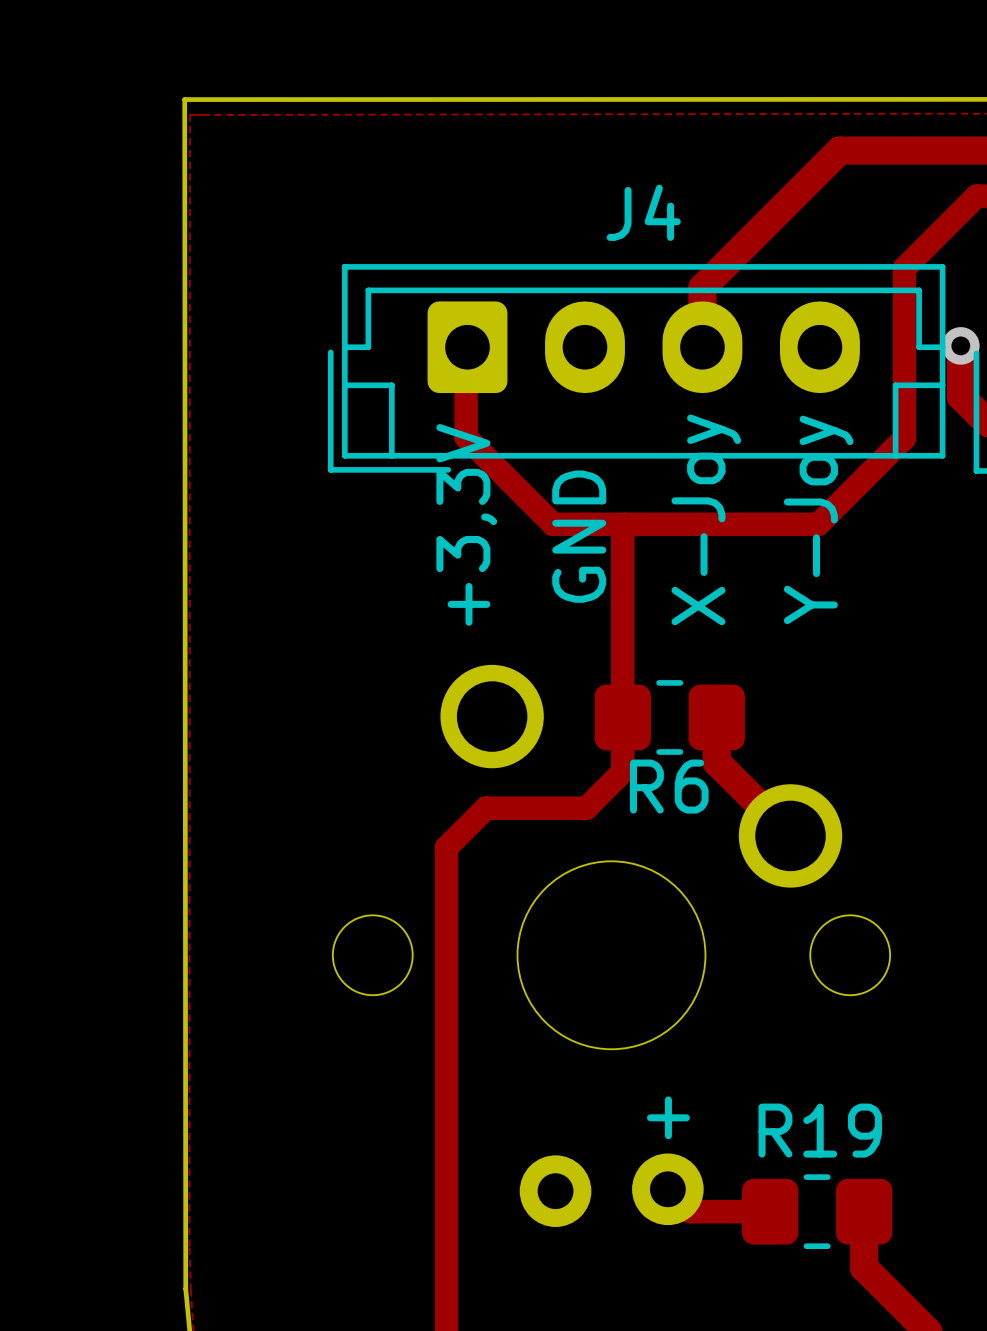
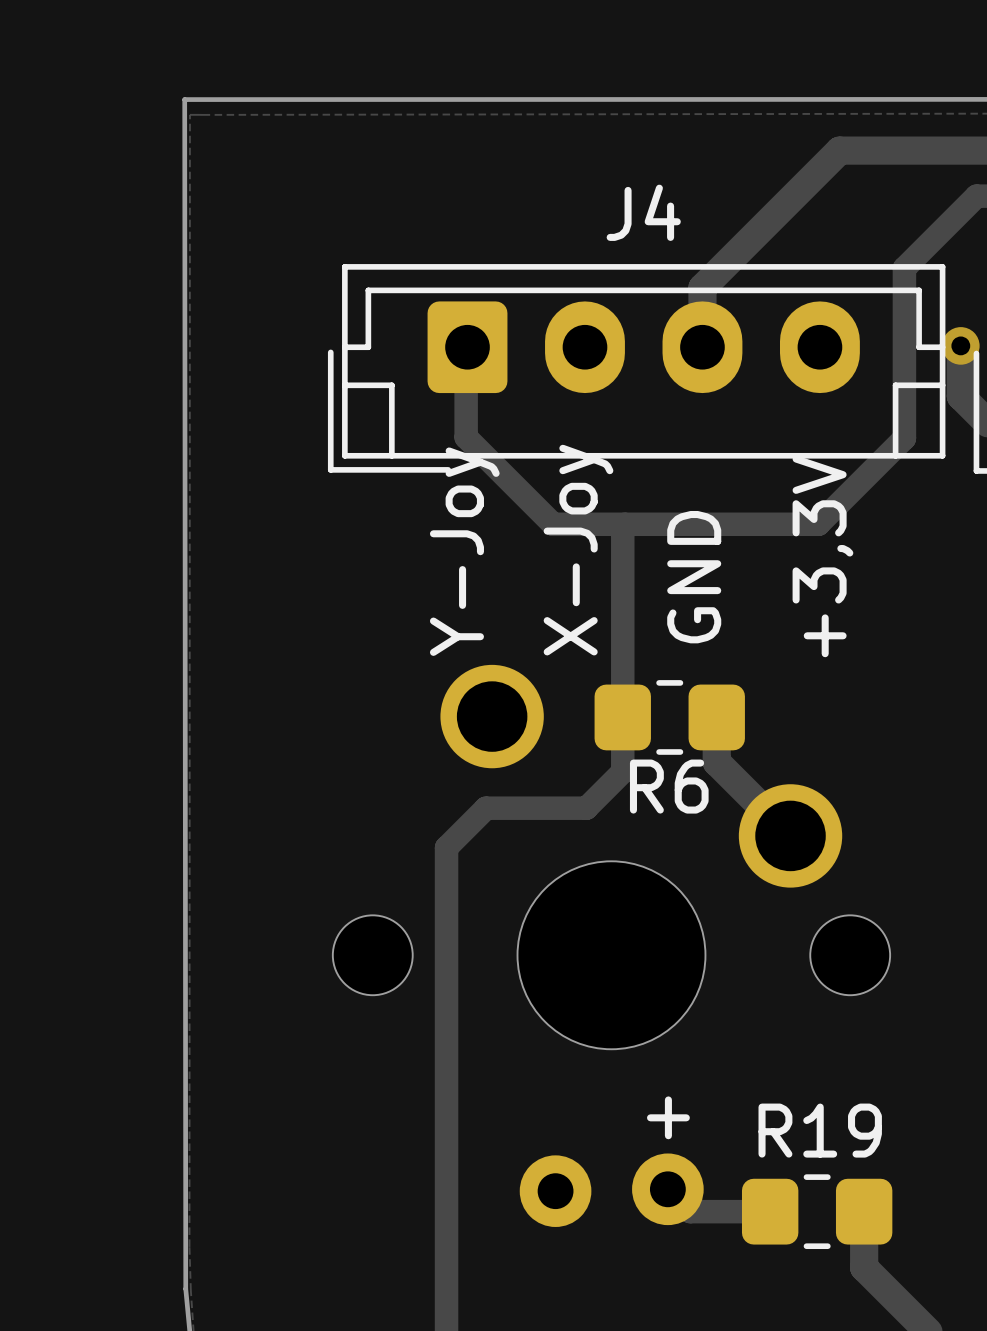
text position: X-Joy (706, 519) -> X-Joy (578, 550)
text position: Y-Joy (818, 519) -> Y-Joy (464, 551)
text position: +3,3V (466, 524) -> +3,3V (822, 556)
text position: GND (579, 536) -> GND (694, 577)

